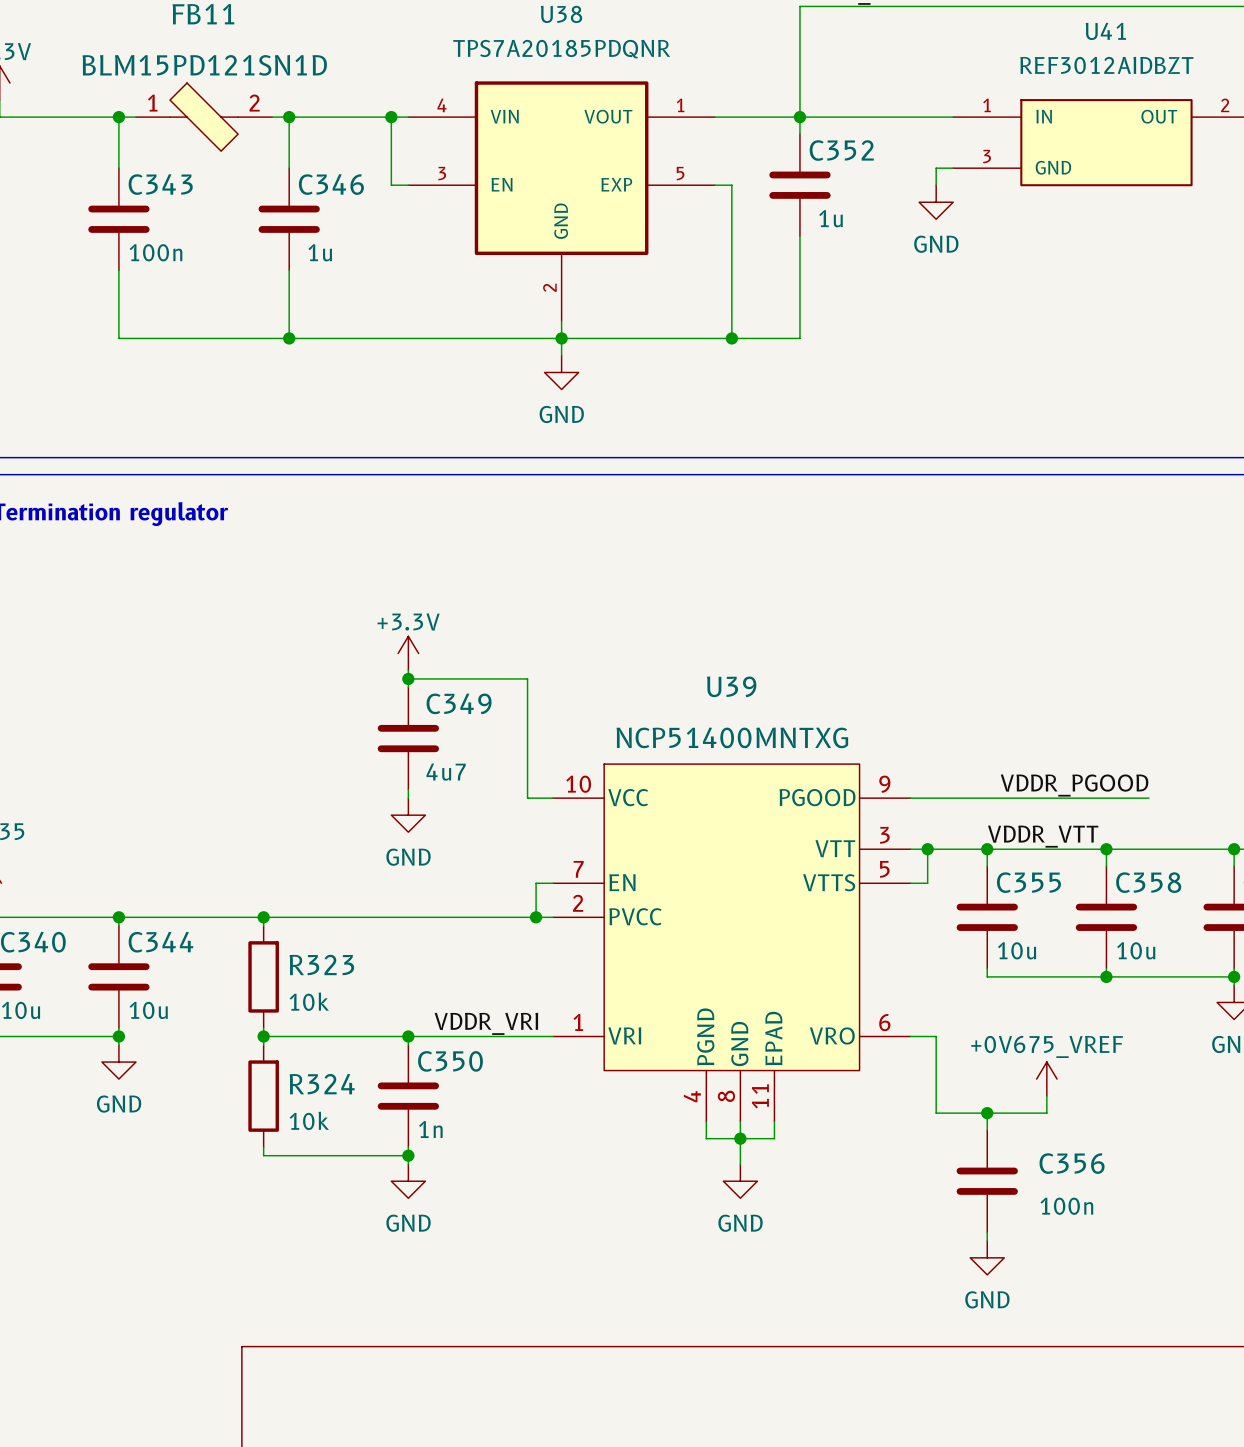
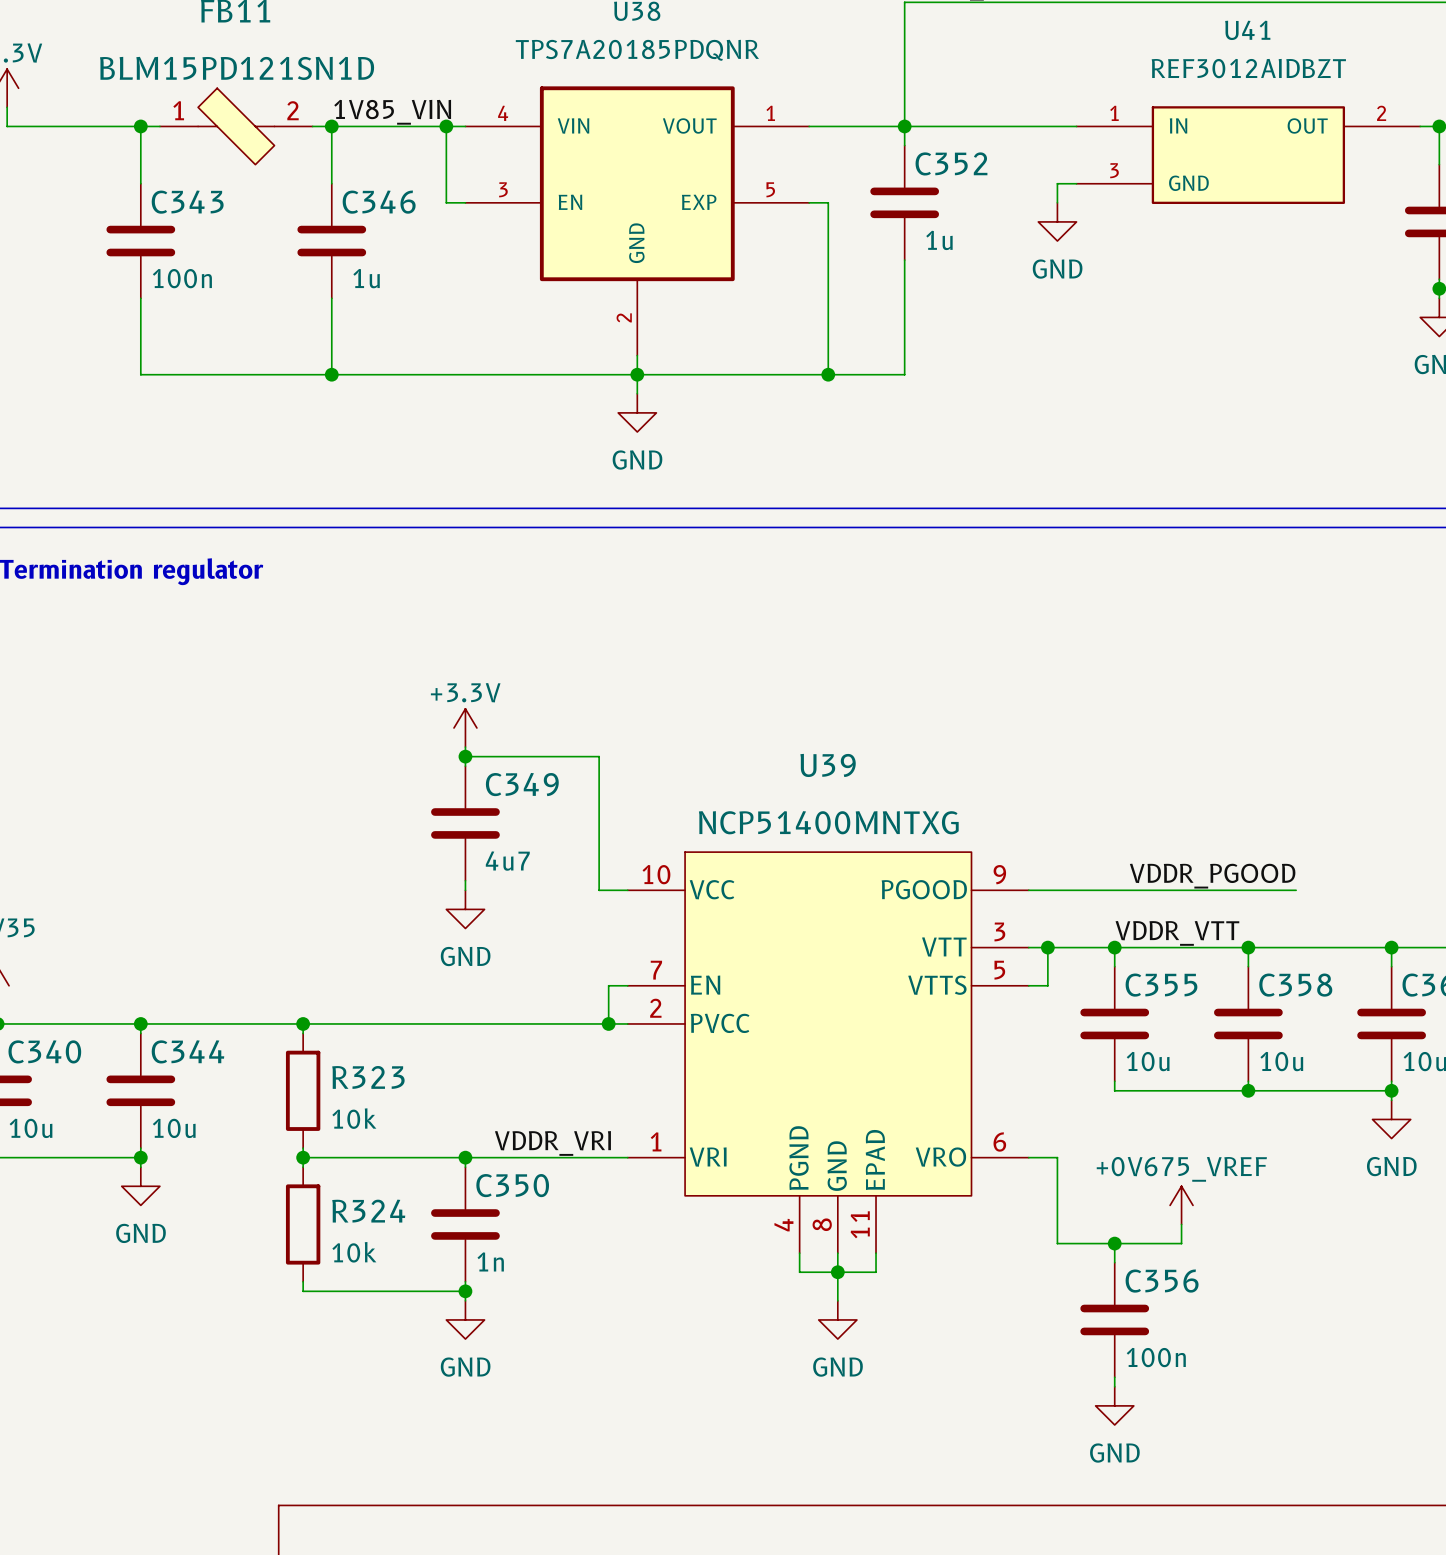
label: none -> 1V85_VIN (392, 112)
C356 name position: C356 (1072, 1163) -> C356 (1162, 1281)
C356 text position: 100n (1066, 1206) -> 100n (1156, 1357)

